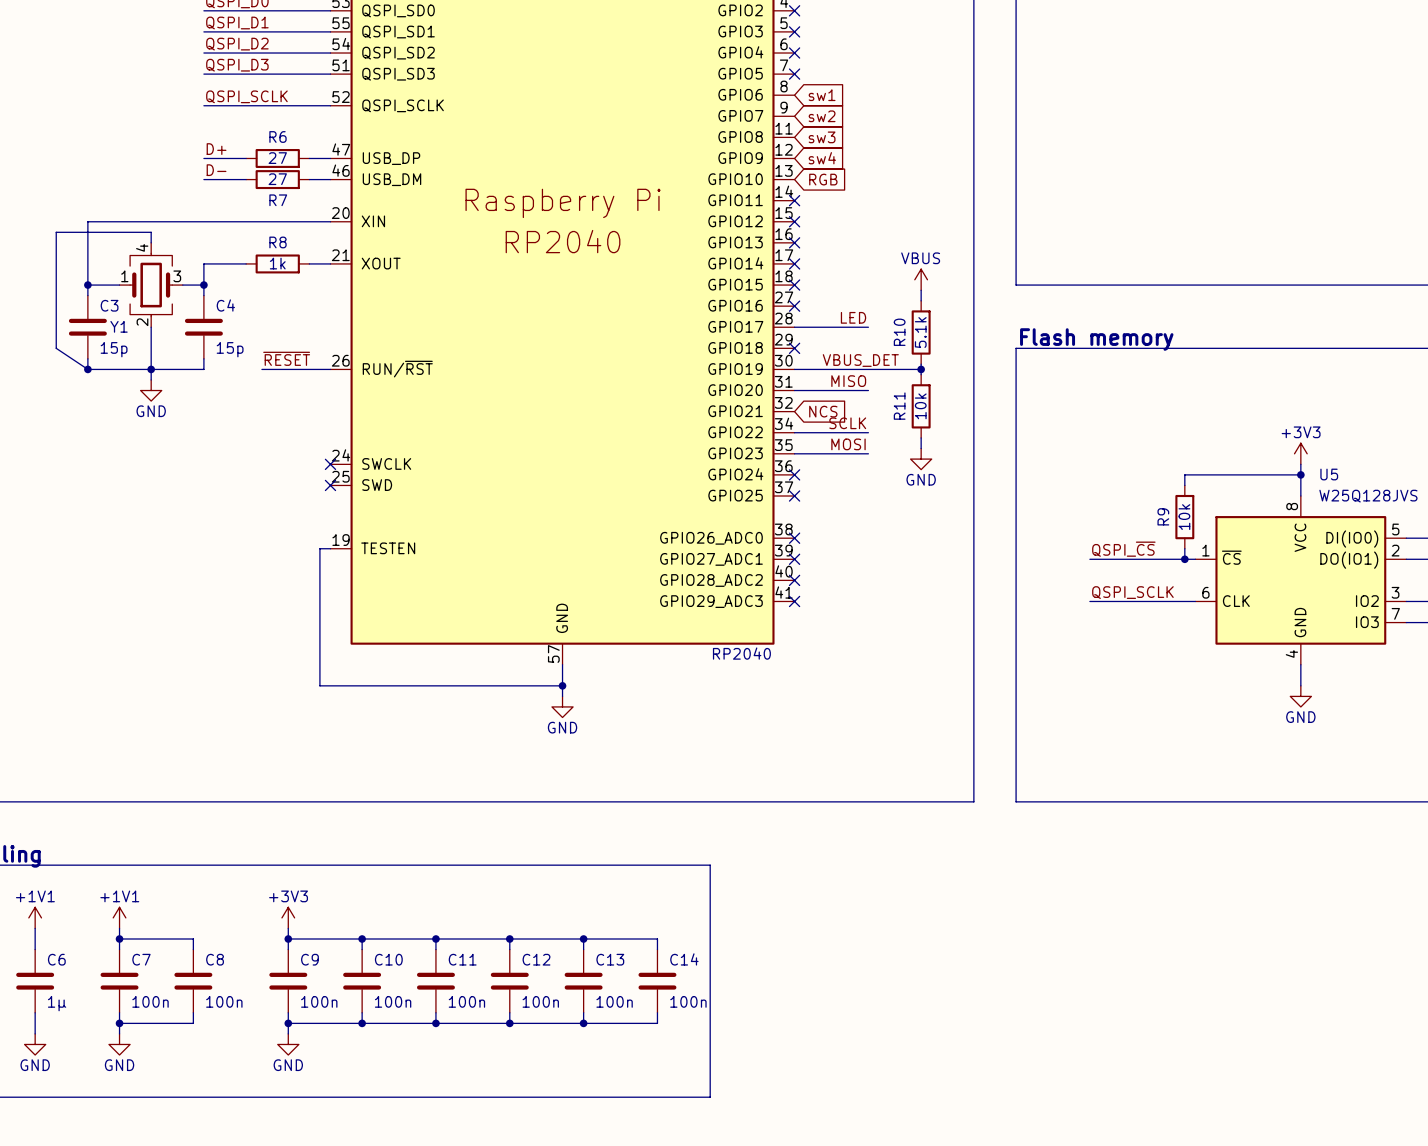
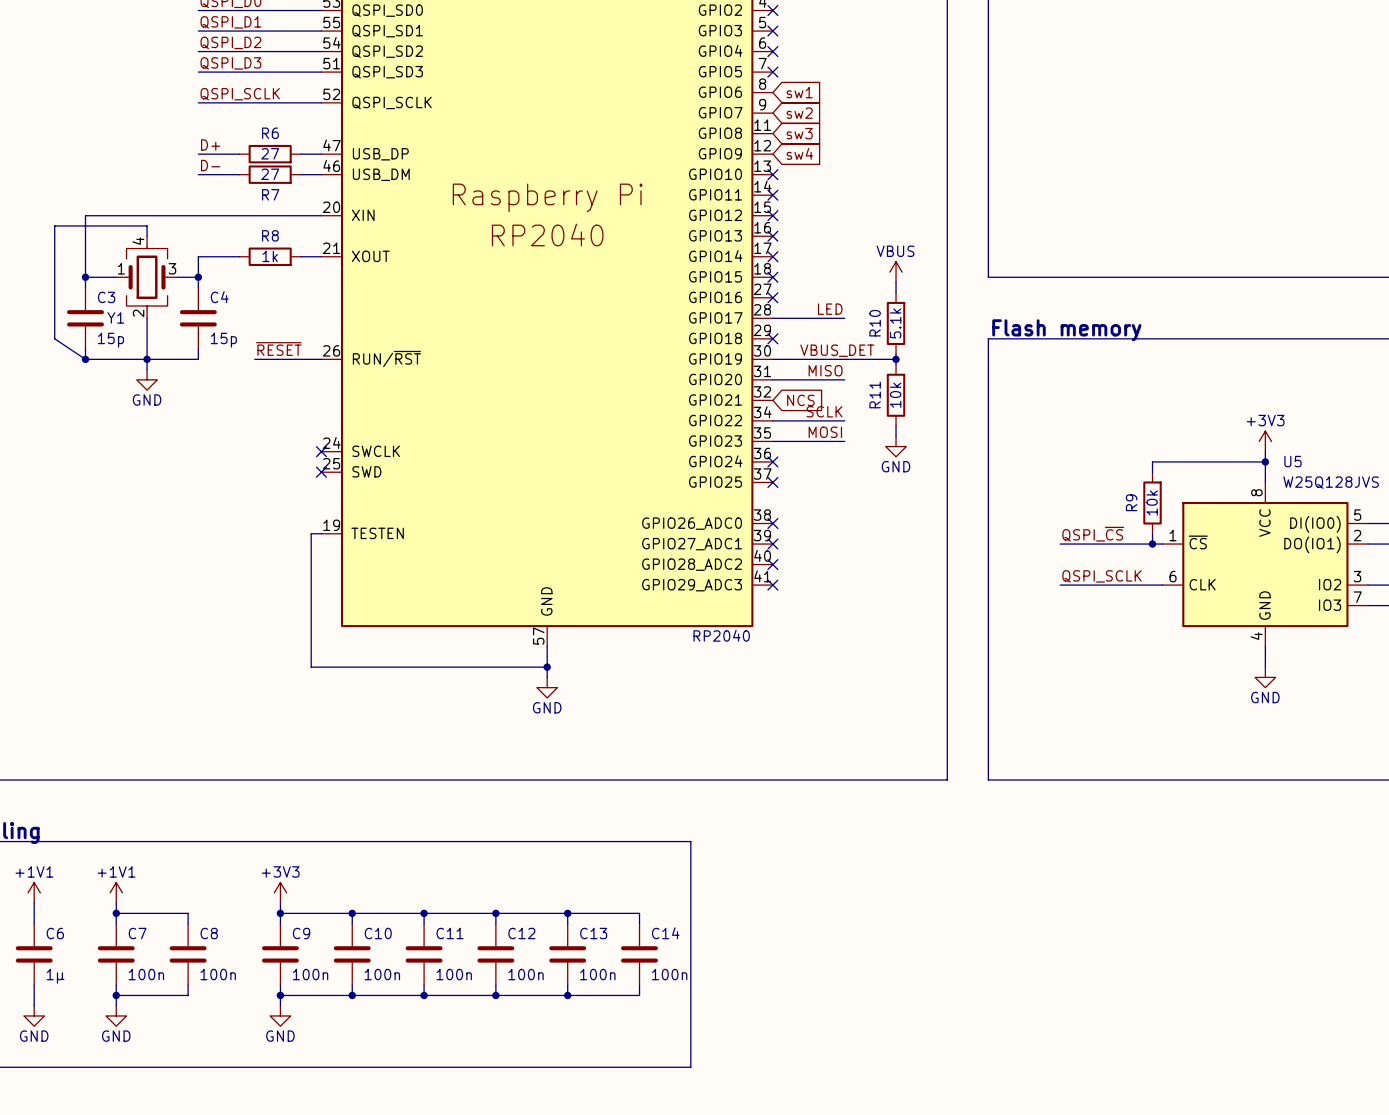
no-connect mark: none -> (772, 174)
global label: RGB (823, 179) -> none

